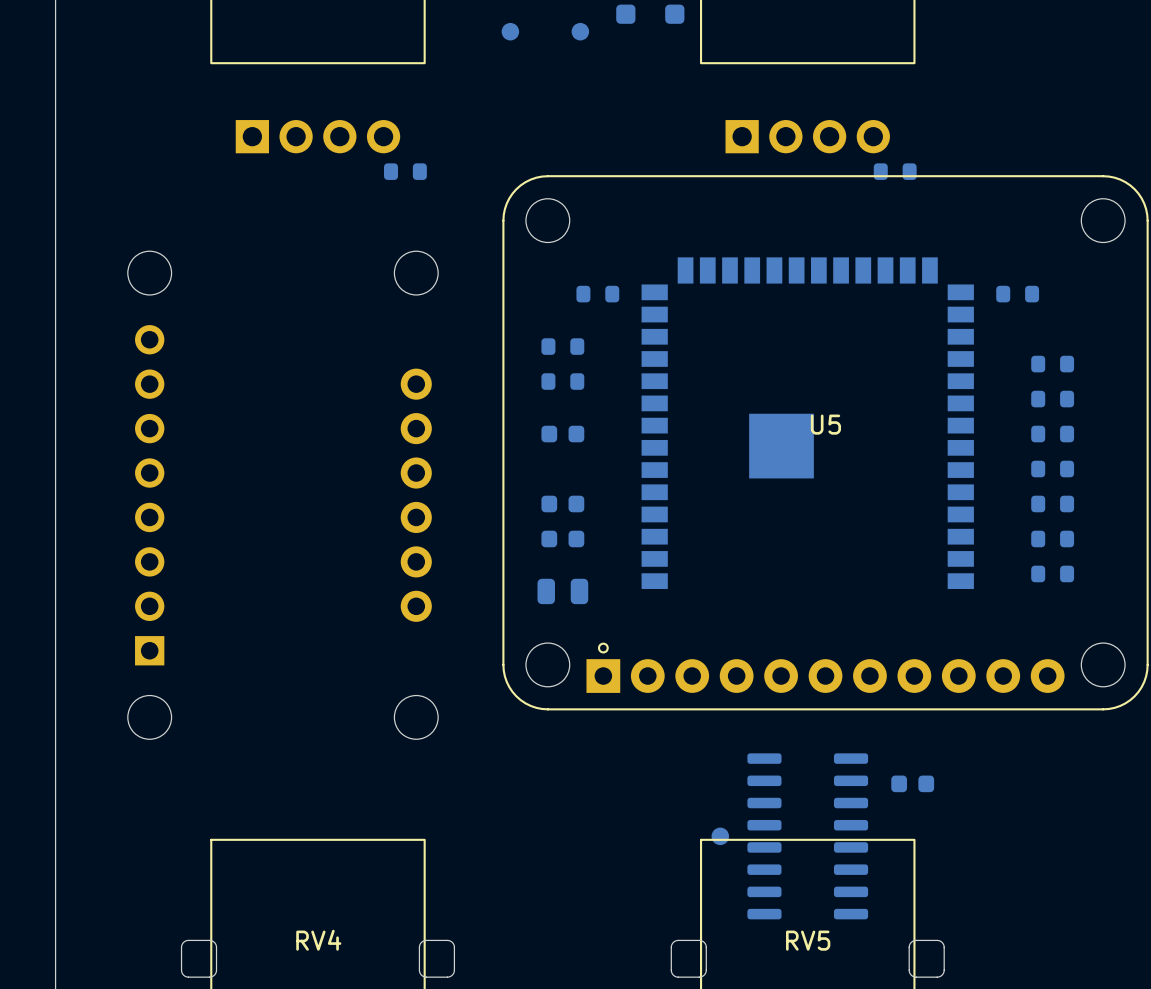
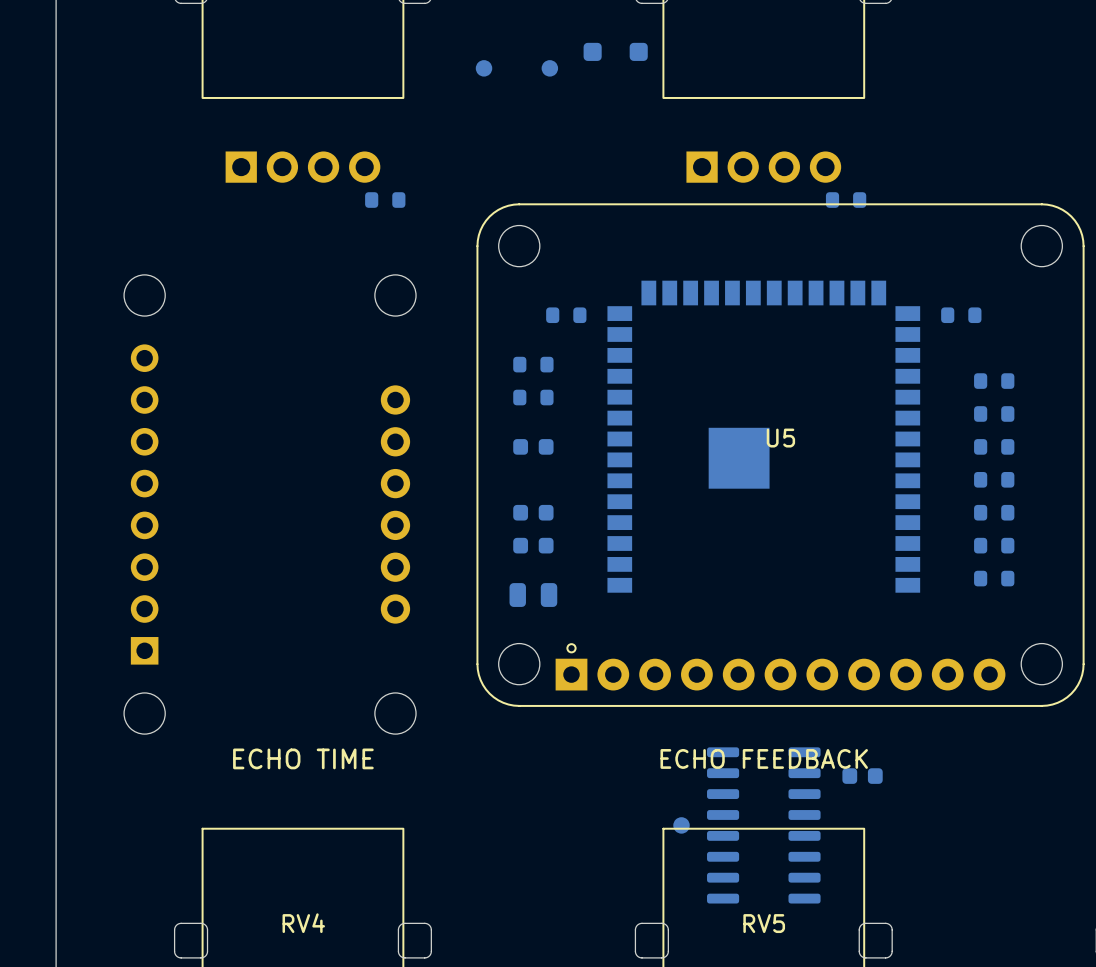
text: none -> ECHO TIME (303, 758)
text: none -> ECHO FEEDBACK (764, 758)

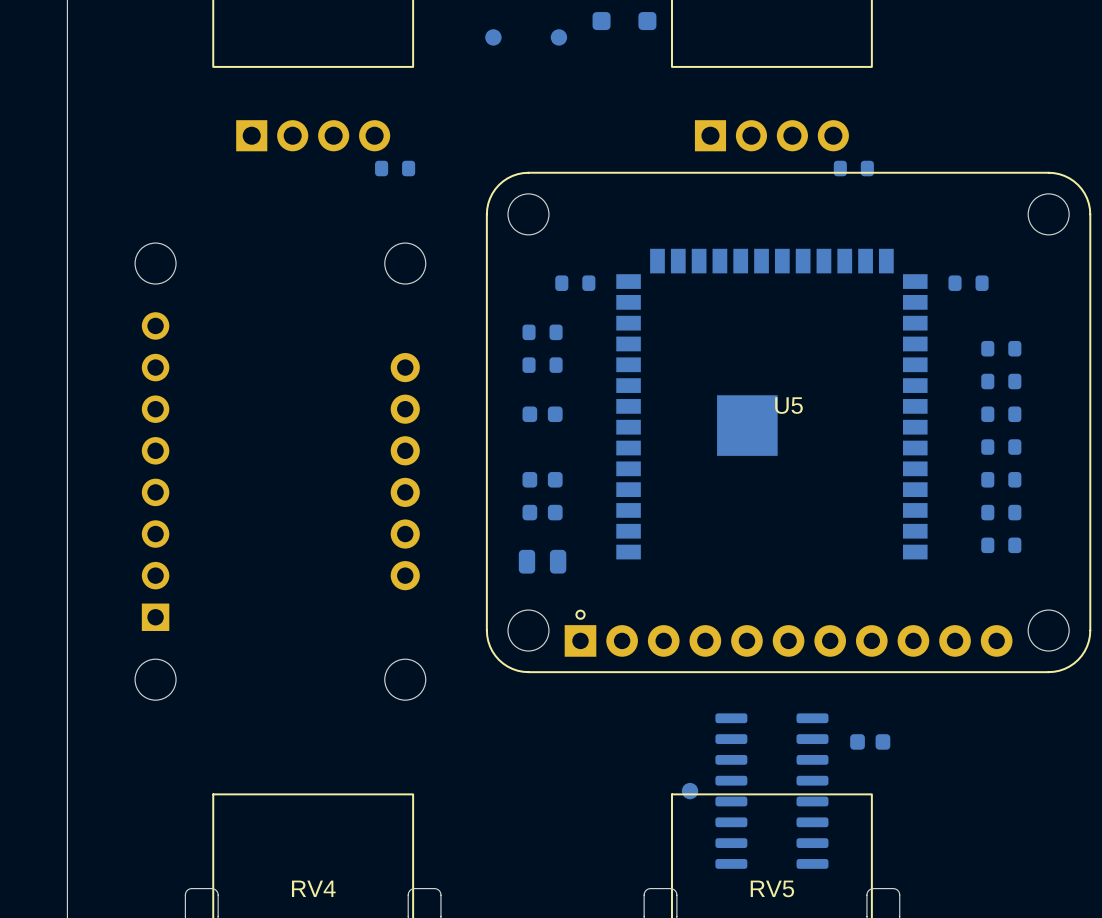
text: ECHO TIME (303, 758) -> none
text: ECHO FEEDBACK (764, 758) -> none

